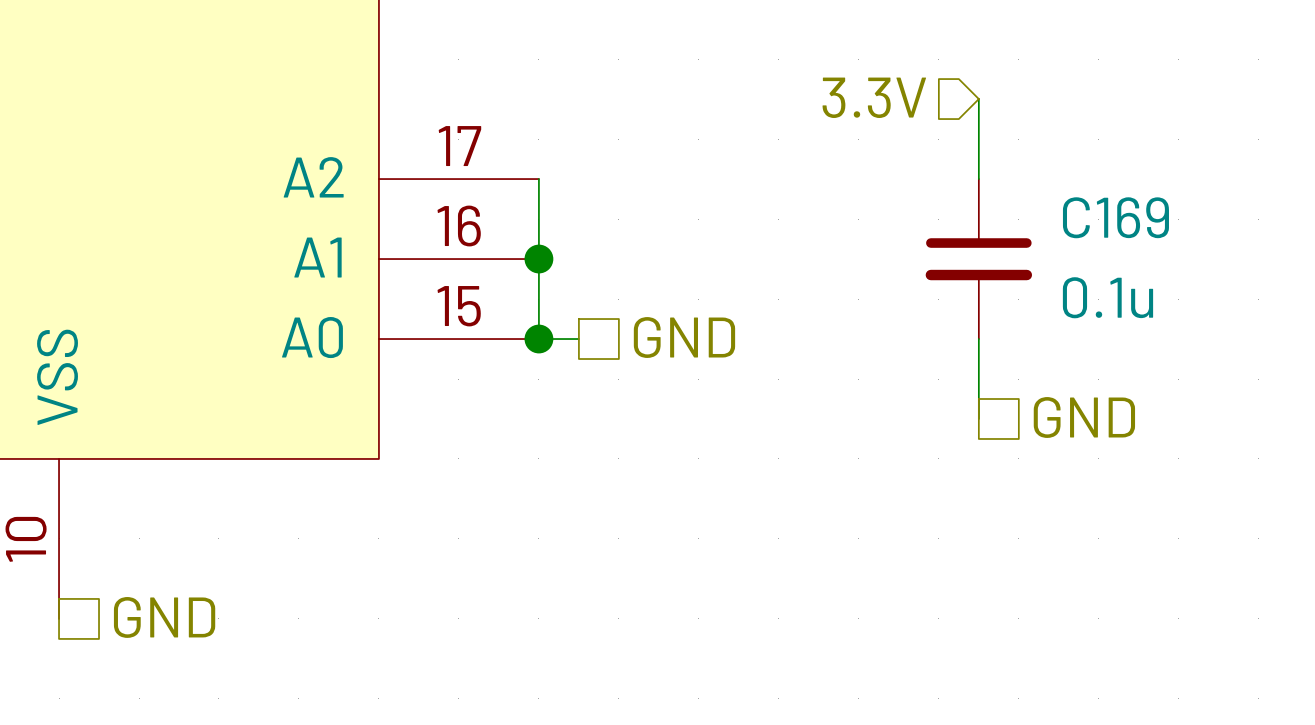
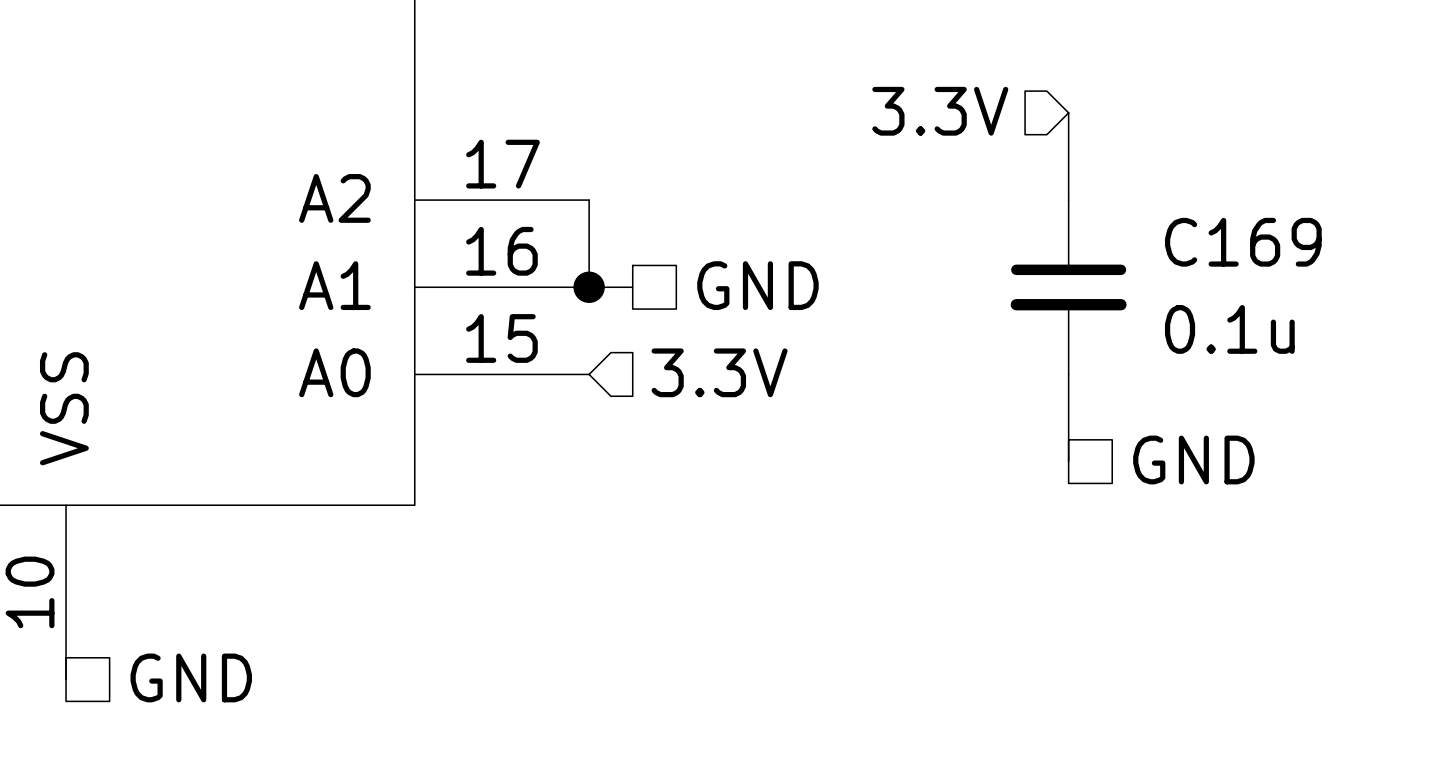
wire: (538, 259) (538, 339) (578, 339) -> (589, 287) (632, 287)
hierarchical label: none -> 3.3V (719, 372)
hierarchical label position: GND (684, 337) -> GND (757, 285)
junction: (538, 339) -> none

